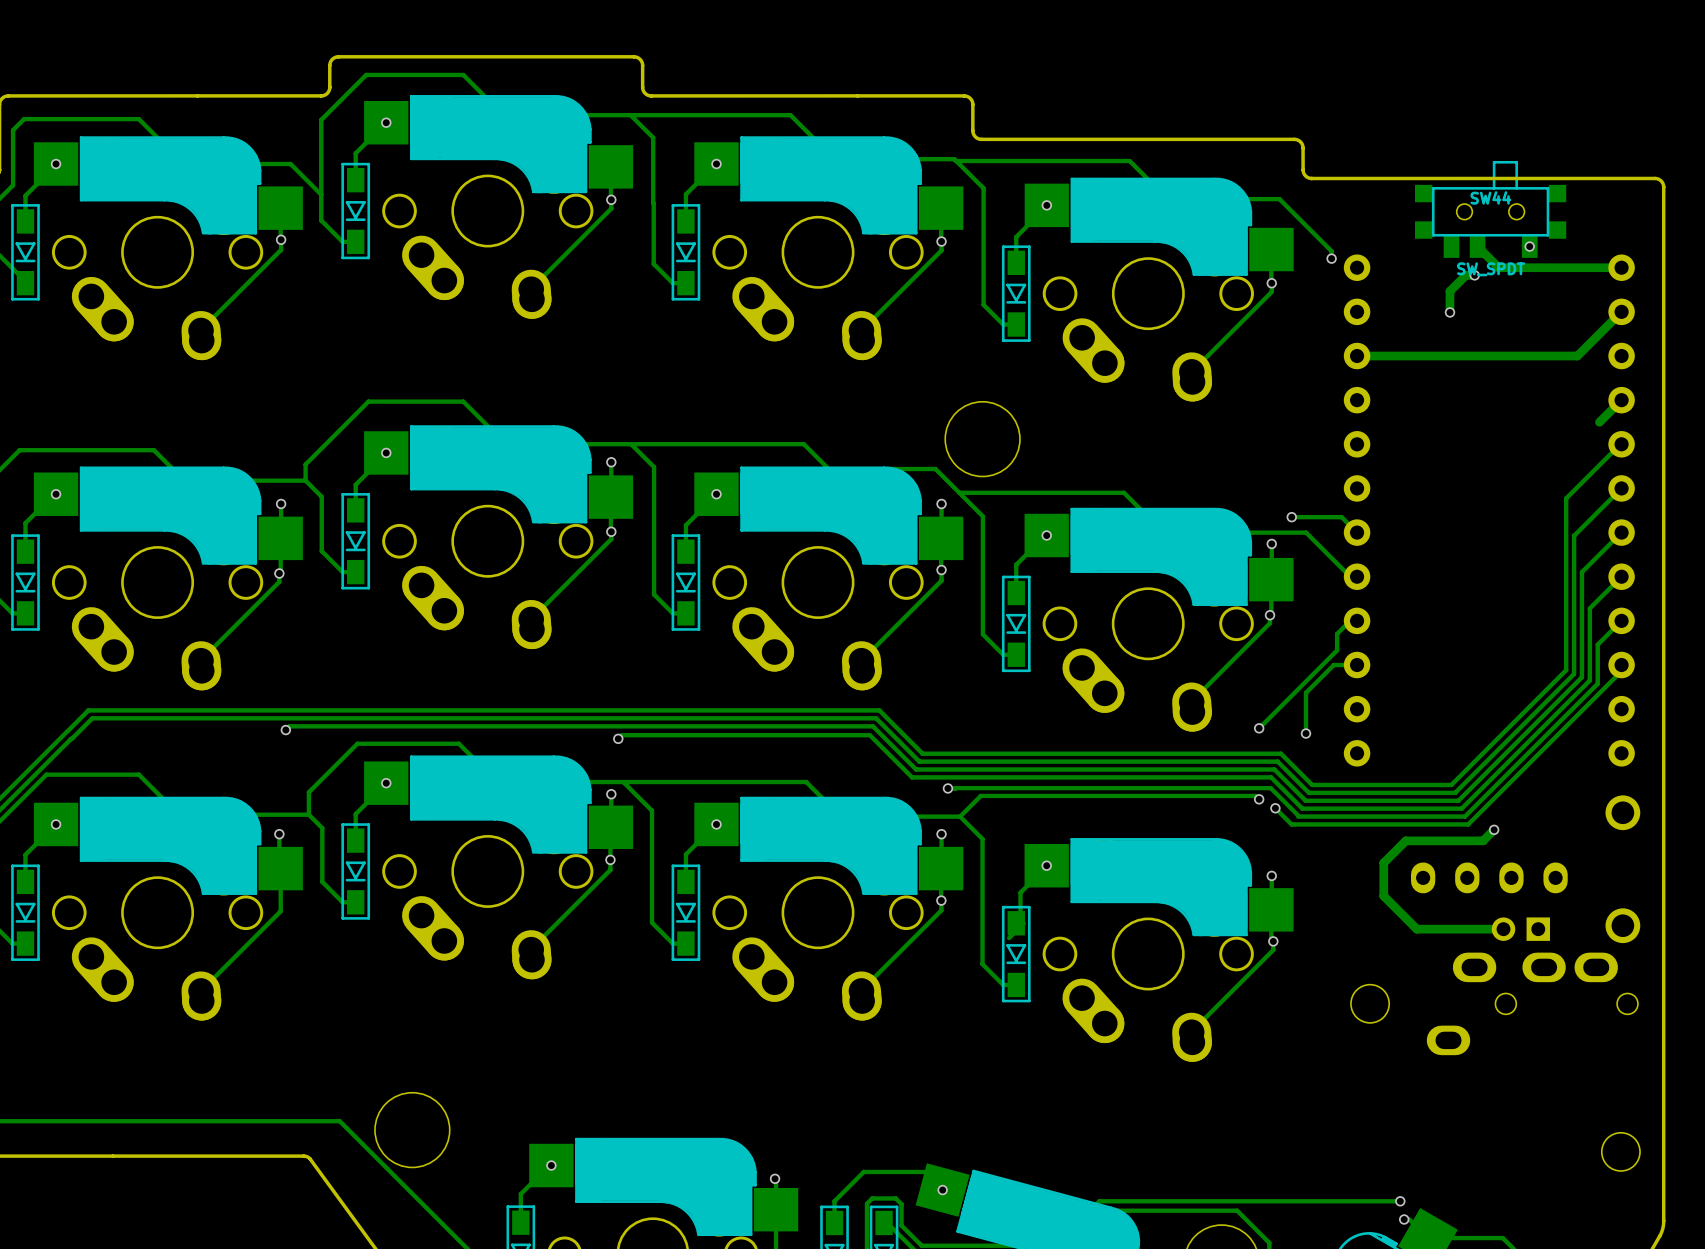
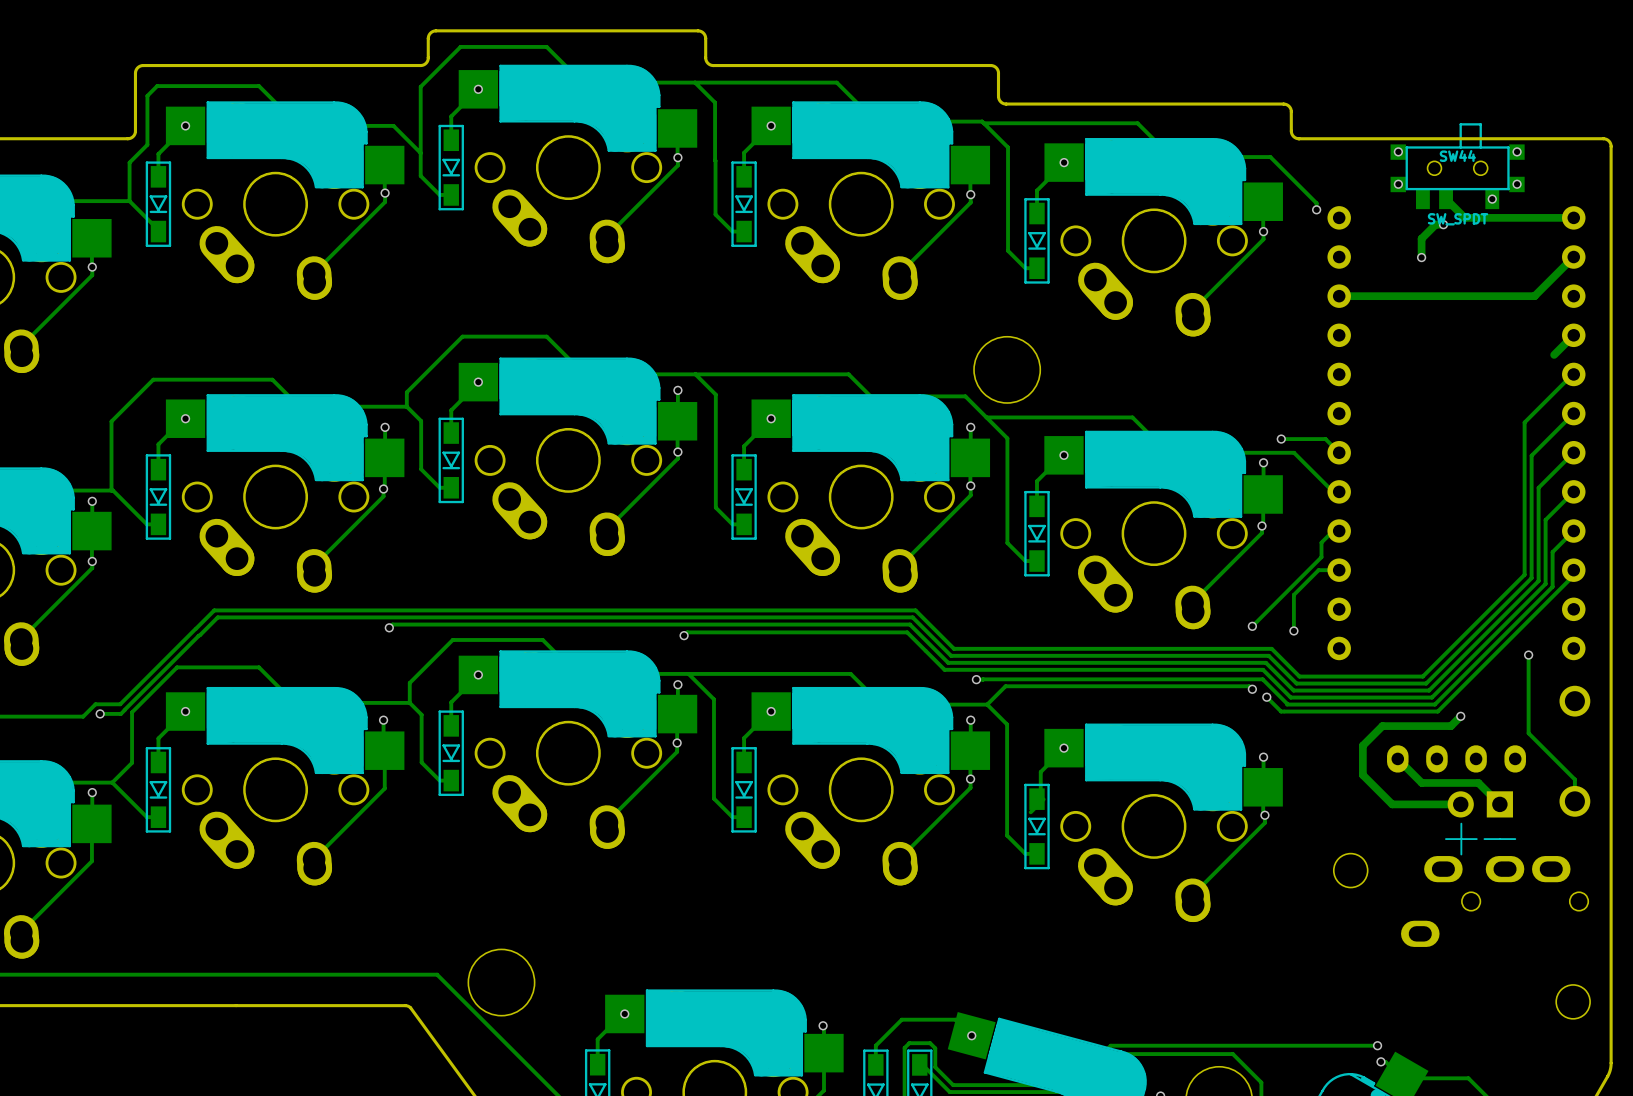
via: none -> (1398, 151)
via: none -> (1517, 151)
via: none -> (1398, 184)
via: none -> (1517, 184)
track: none -> (1528, 655) (1528, 733) (1574, 779) (1574, 801)
via: none -> (1528, 655)
track: none -> (1397, 760) (1421, 782) (1478, 782) (1499, 804)
part: (1520, 929) -> none
part: none -> (1480, 823)
part position: (1532, 1003) -> (1494, 901)

